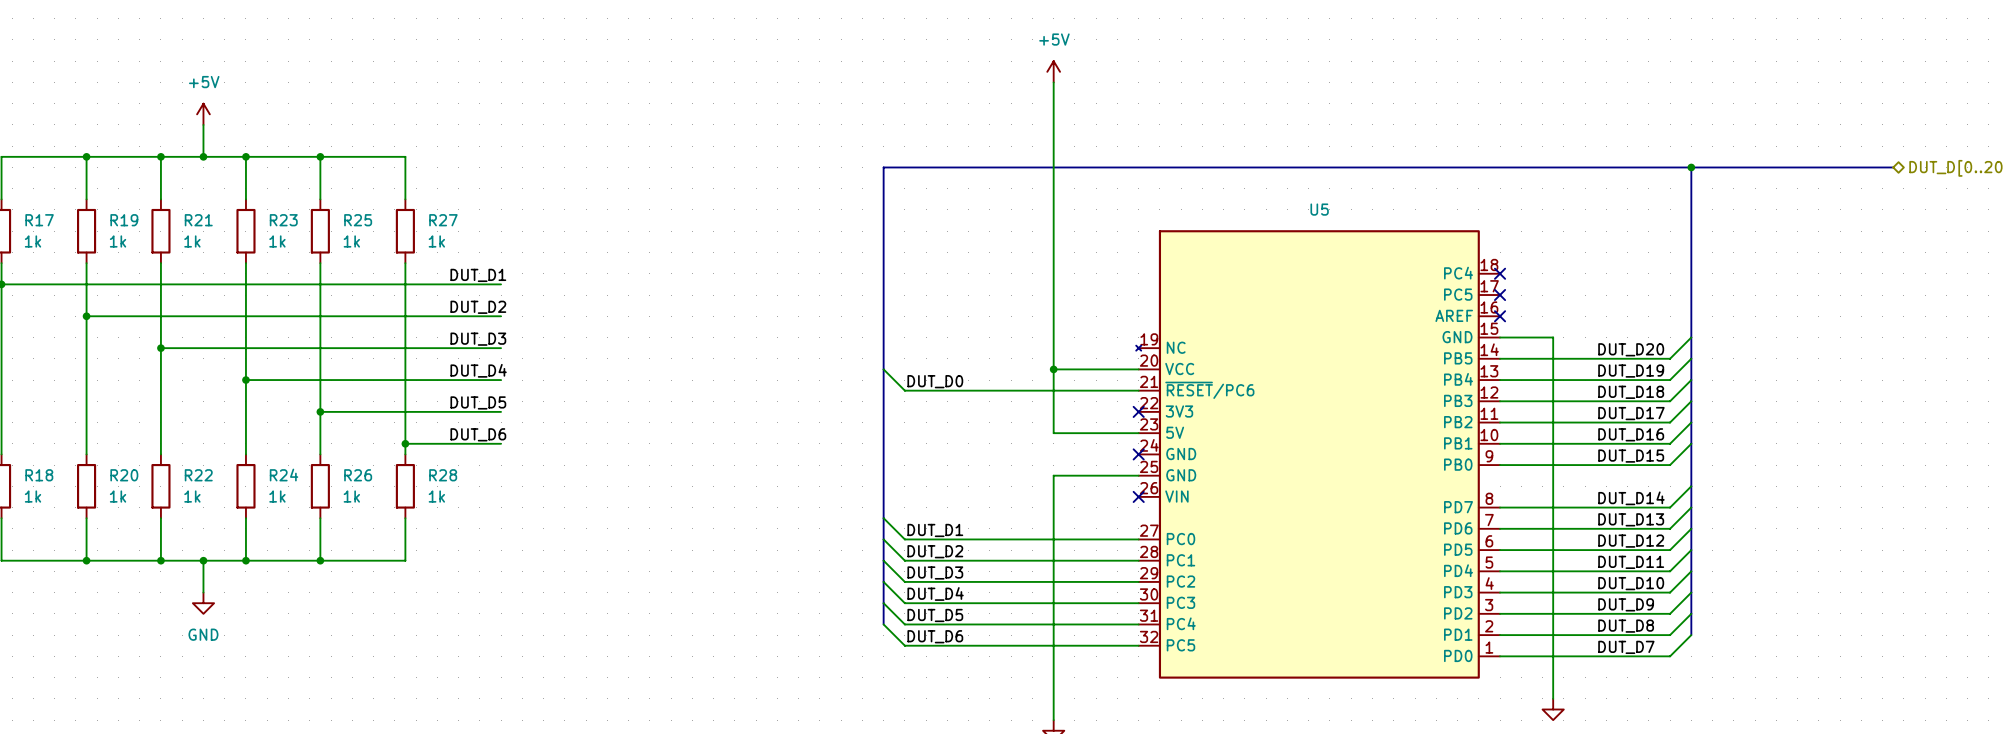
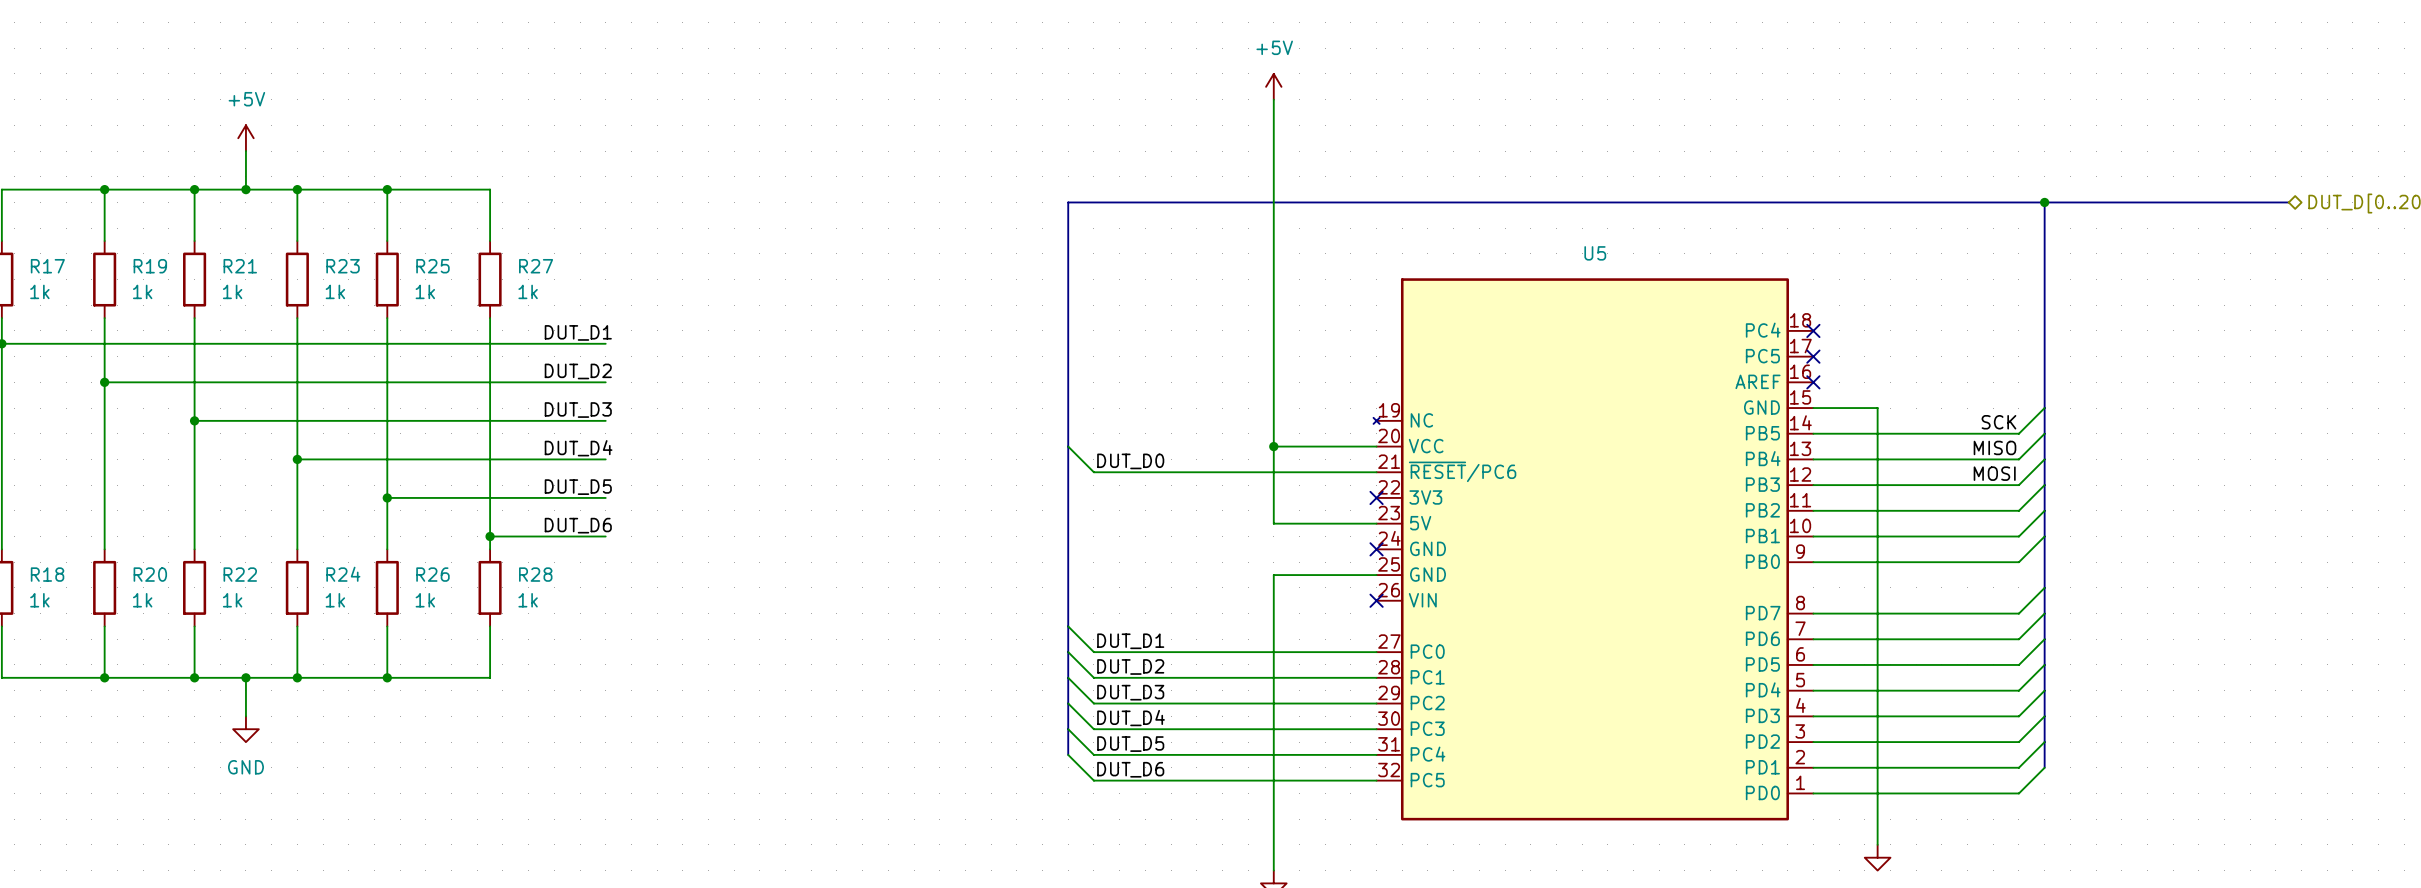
label: DUT_D20 (1631, 349) -> none
label: none -> SCK (1998, 422)
label: none -> MISO (1994, 447)
label: DUT_D19 (1631, 371) -> none
label: none -> MOSI (1994, 473)
label: DUT_D18 (1631, 392) -> none
label: DUT_D17 (1631, 413) -> none
label: DUT_D16 (1631, 434) -> none
label: DUT_D15 (1631, 456) -> none
label: DUT_D14 (1631, 498) -> none
label: DUT_D13 (1631, 519) -> none
label: DUT_D12 (1631, 541) -> none
label: DUT_D11 (1631, 562) -> none
label: DUT_D10 (1631, 583) -> none
label: DUT_D9 (1626, 604) -> none
label: DUT_D8 (1626, 626) -> none
label: DUT_D7 (1626, 647) -> none

